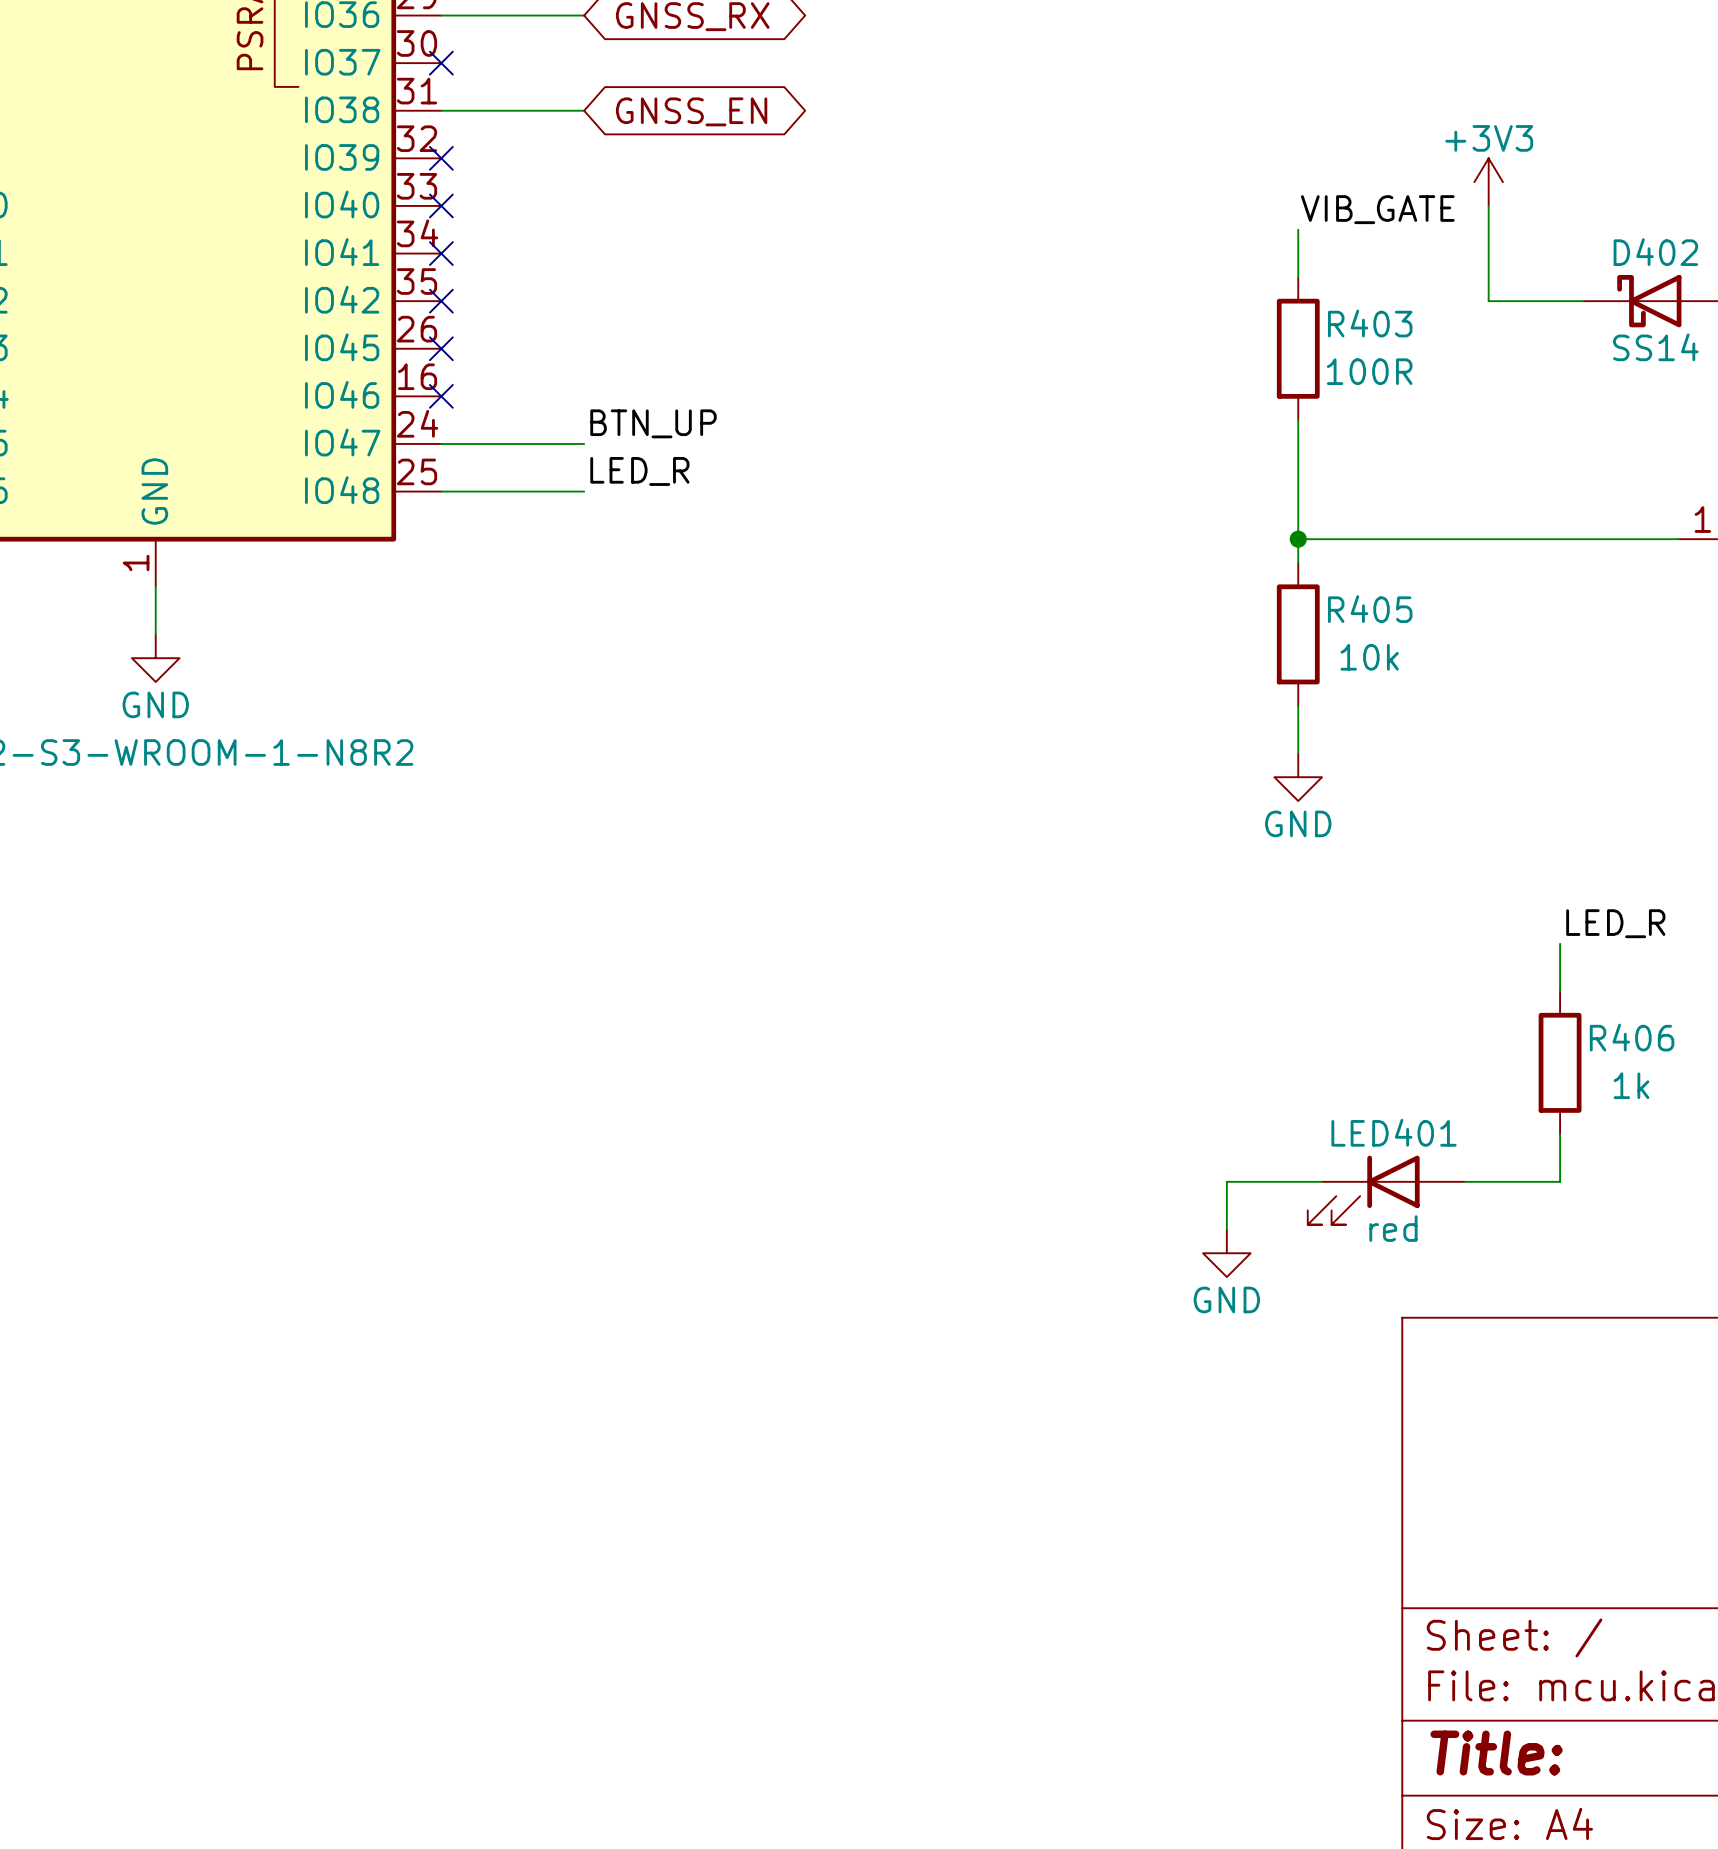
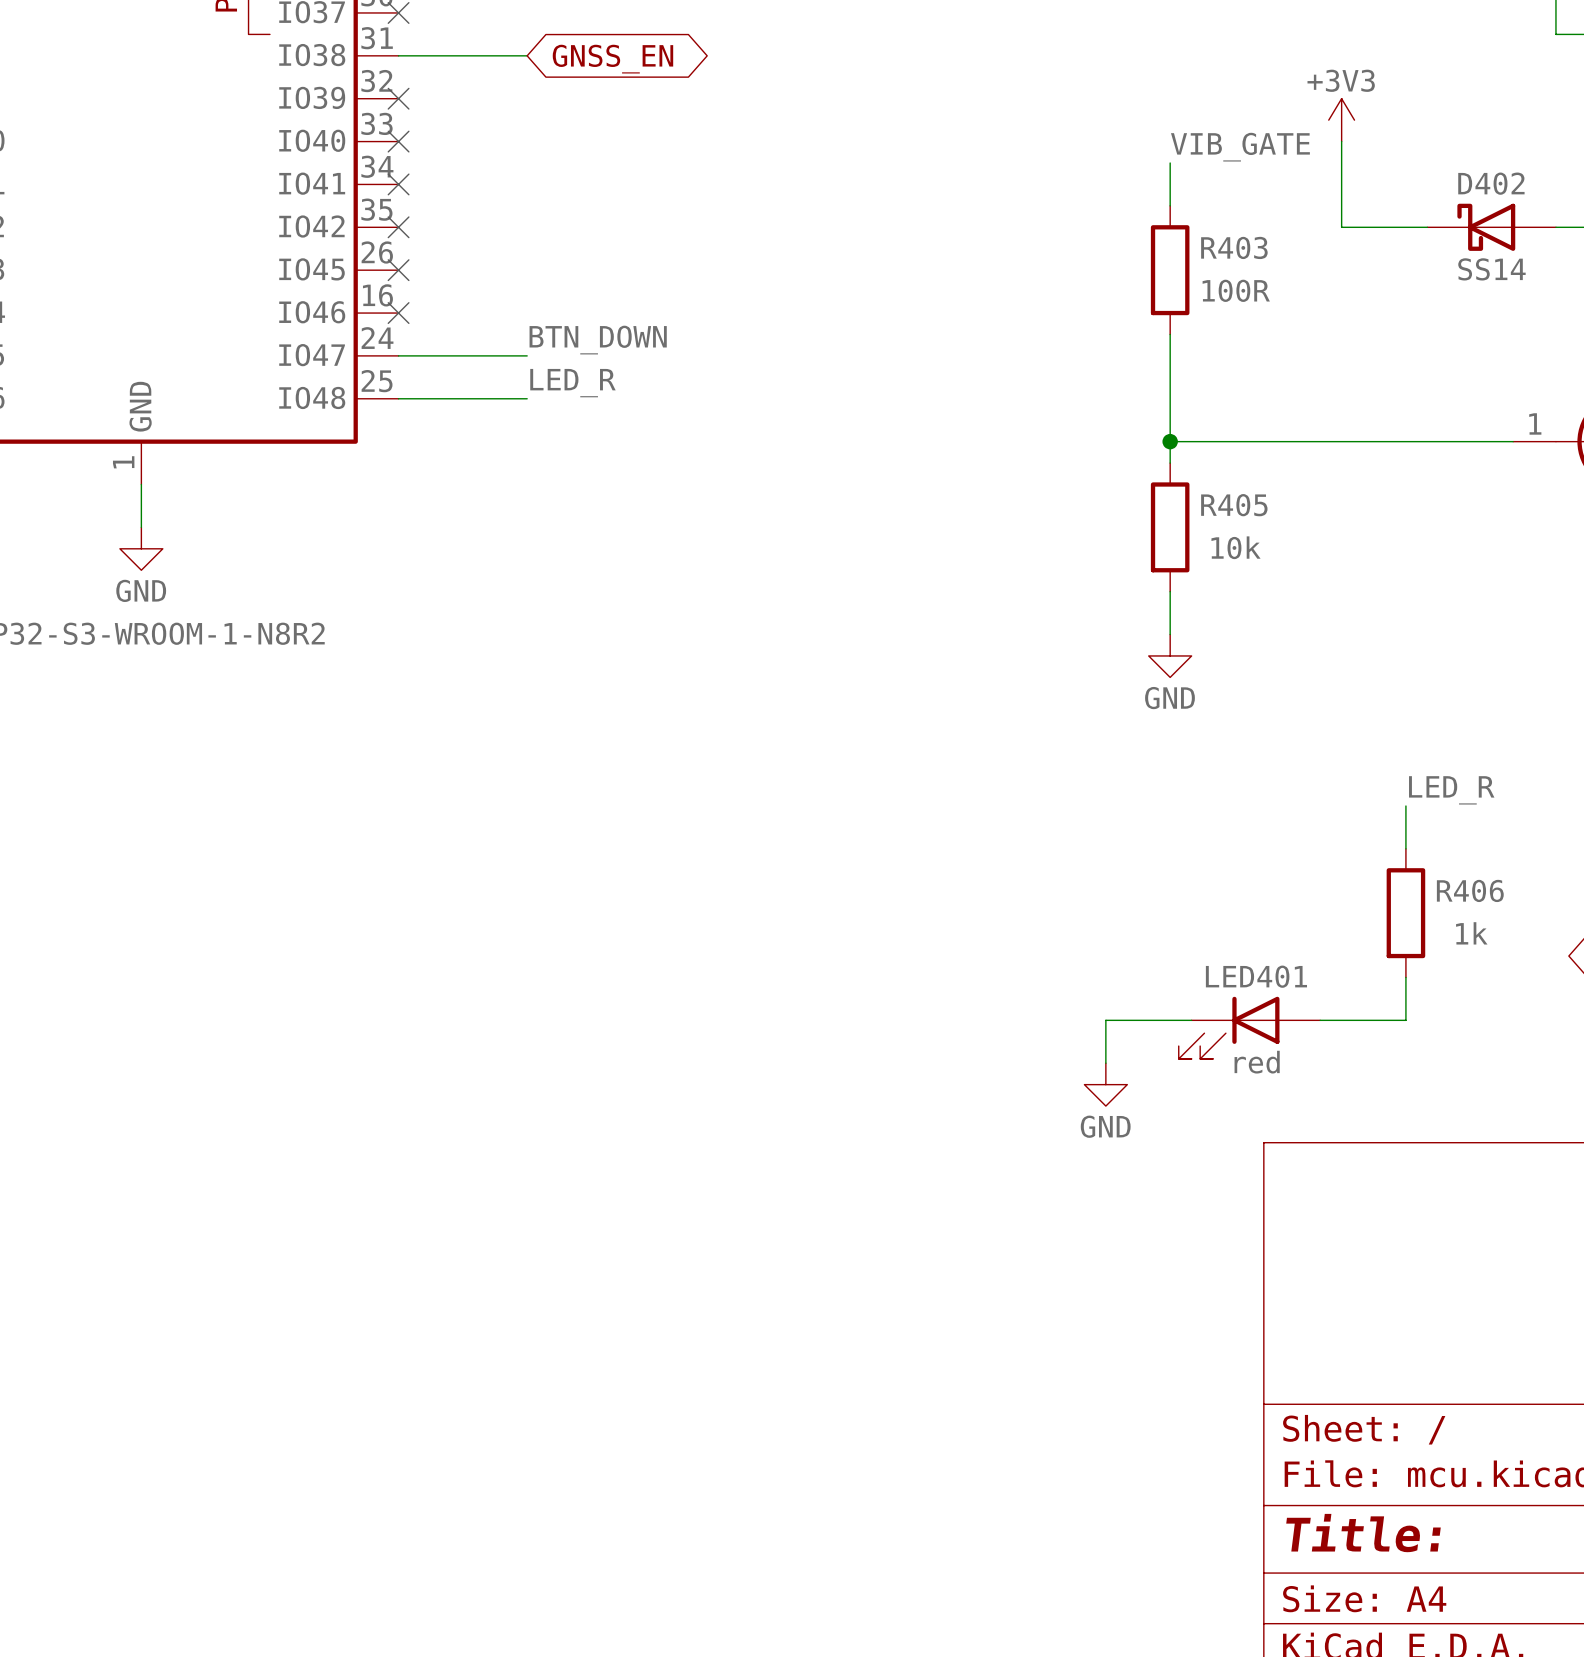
label: BTN_UP (653, 423) -> BTN_DOWN (598, 340)

